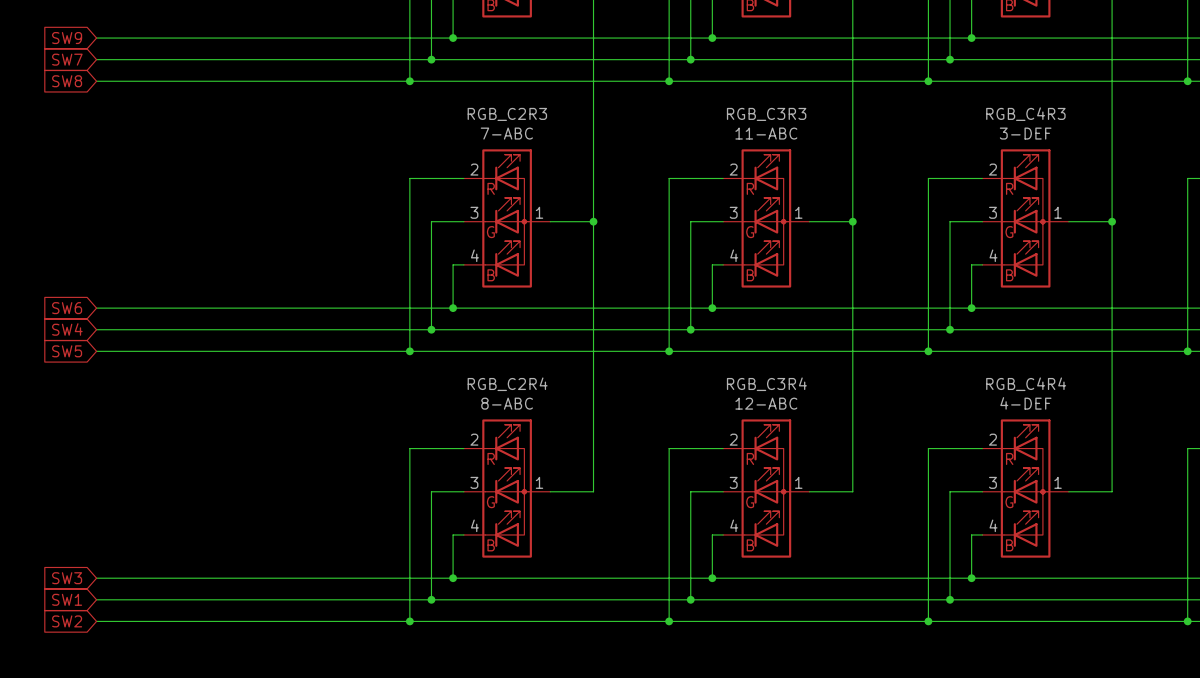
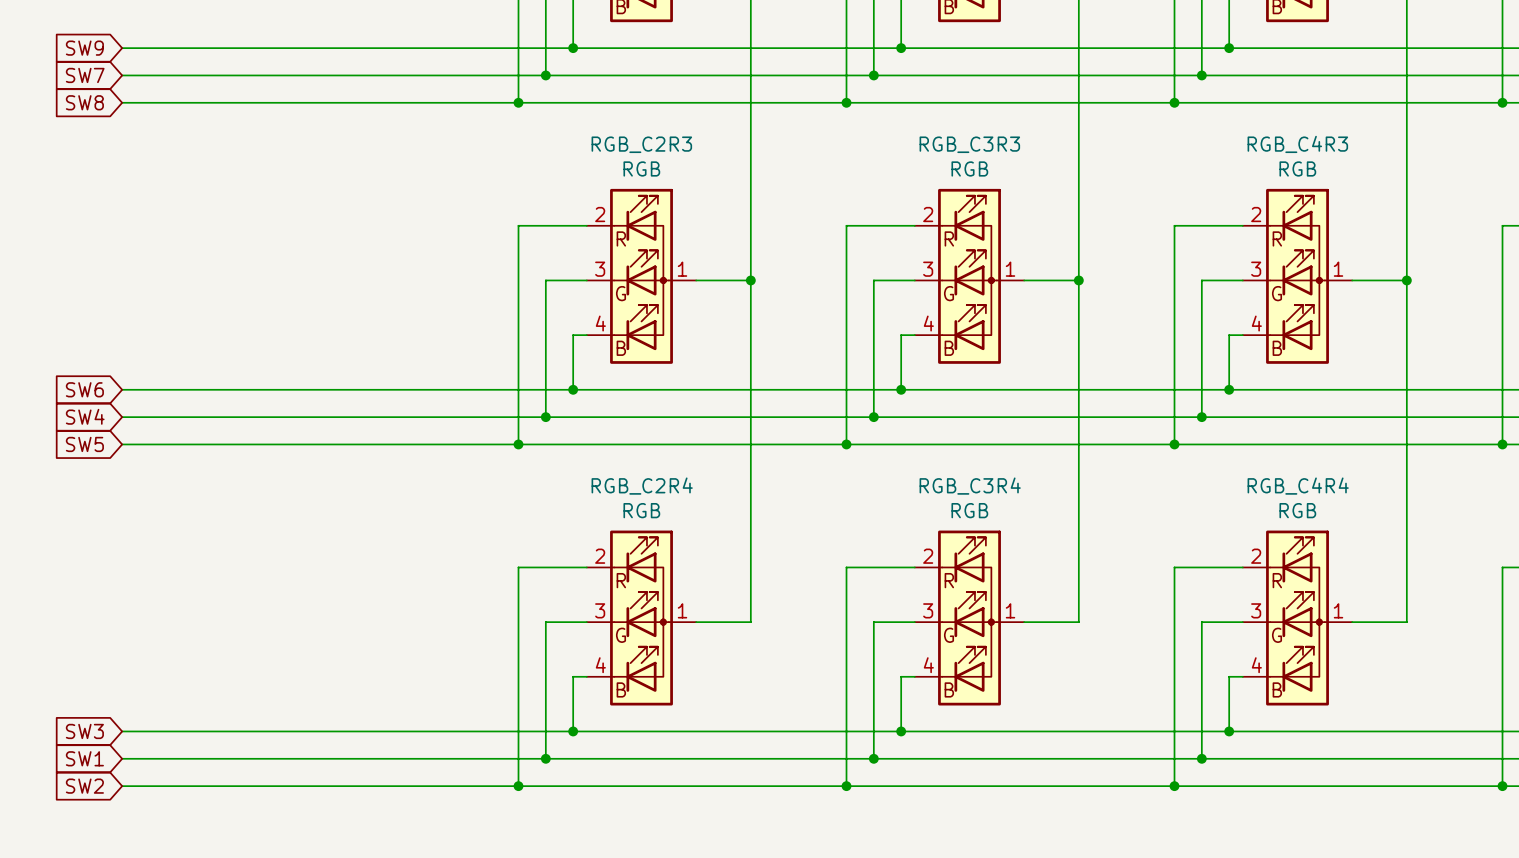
RGB_C2R3 value: 7-ABC (506, 133) -> RGB (641, 168)
RGB_C3R3 value: 11-ABC (766, 133) -> RGB (969, 168)
RGB_C4R3 value: 3-DEF (1025, 133) -> RGB (1297, 168)
RGB_C2R4 value: 8-ABC (507, 403) -> RGB (641, 510)
RGB_C3R4 value: 12-ABC (766, 403) -> RGB (969, 510)
RGB_C4R4 value: 4-DEF (1025, 403) -> RGB (1297, 510)

